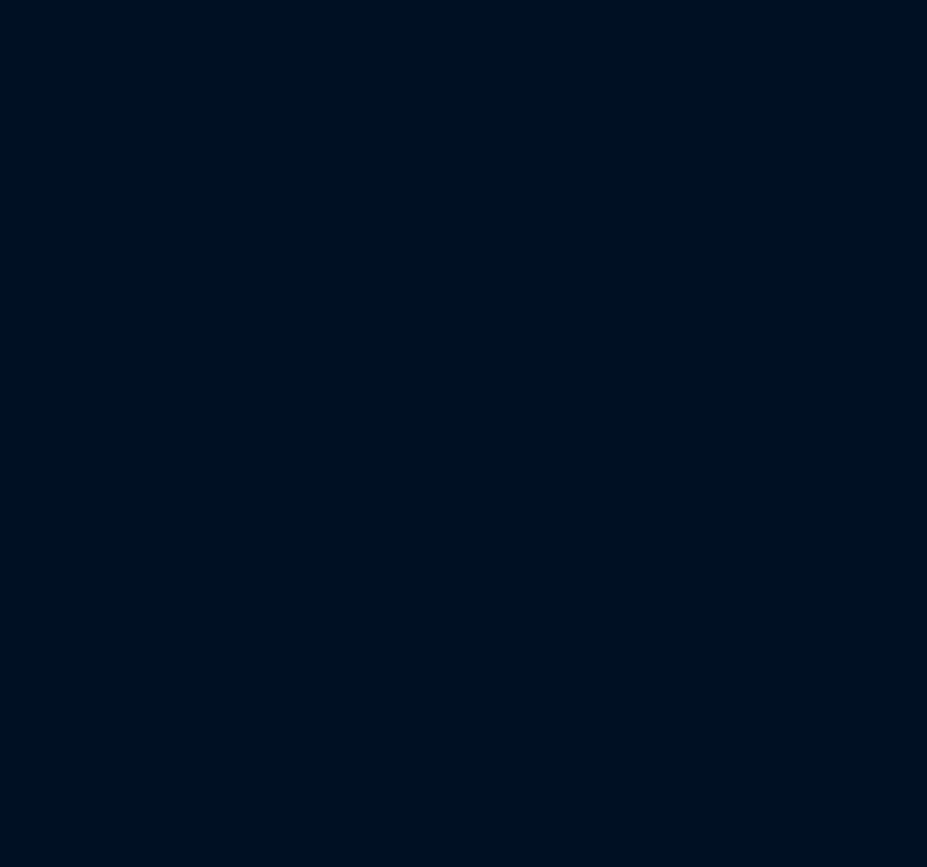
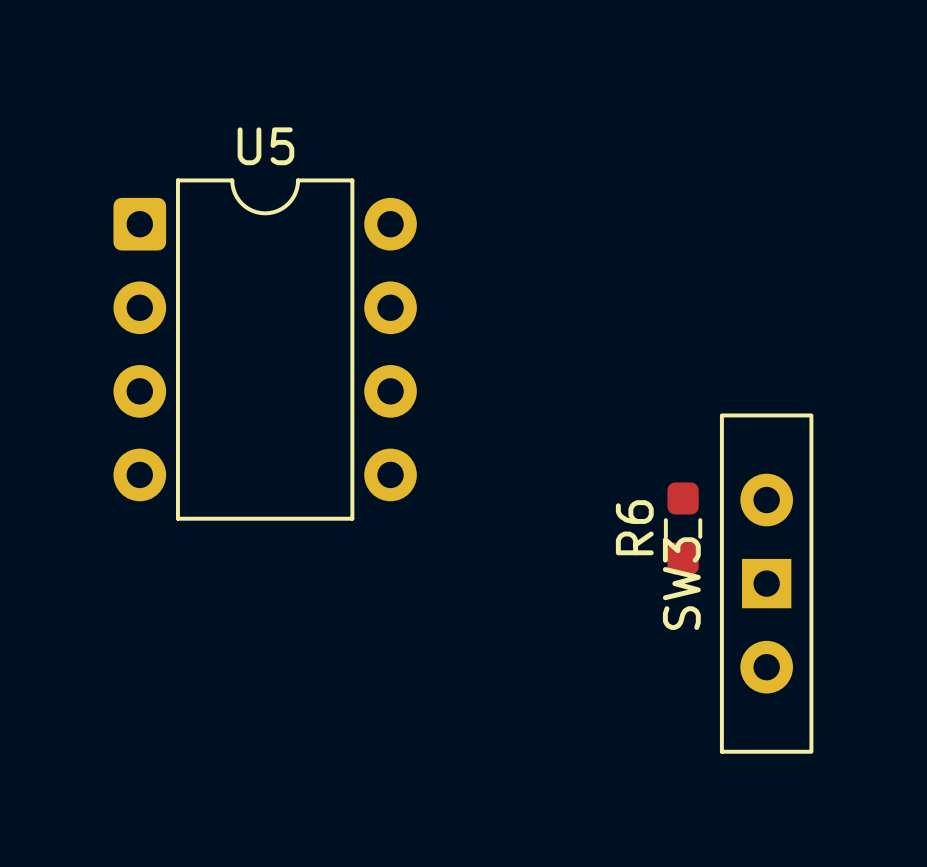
U5: none -> (265, 349)
R6: none -> (683, 528)
SW3: none -> (766, 583)

